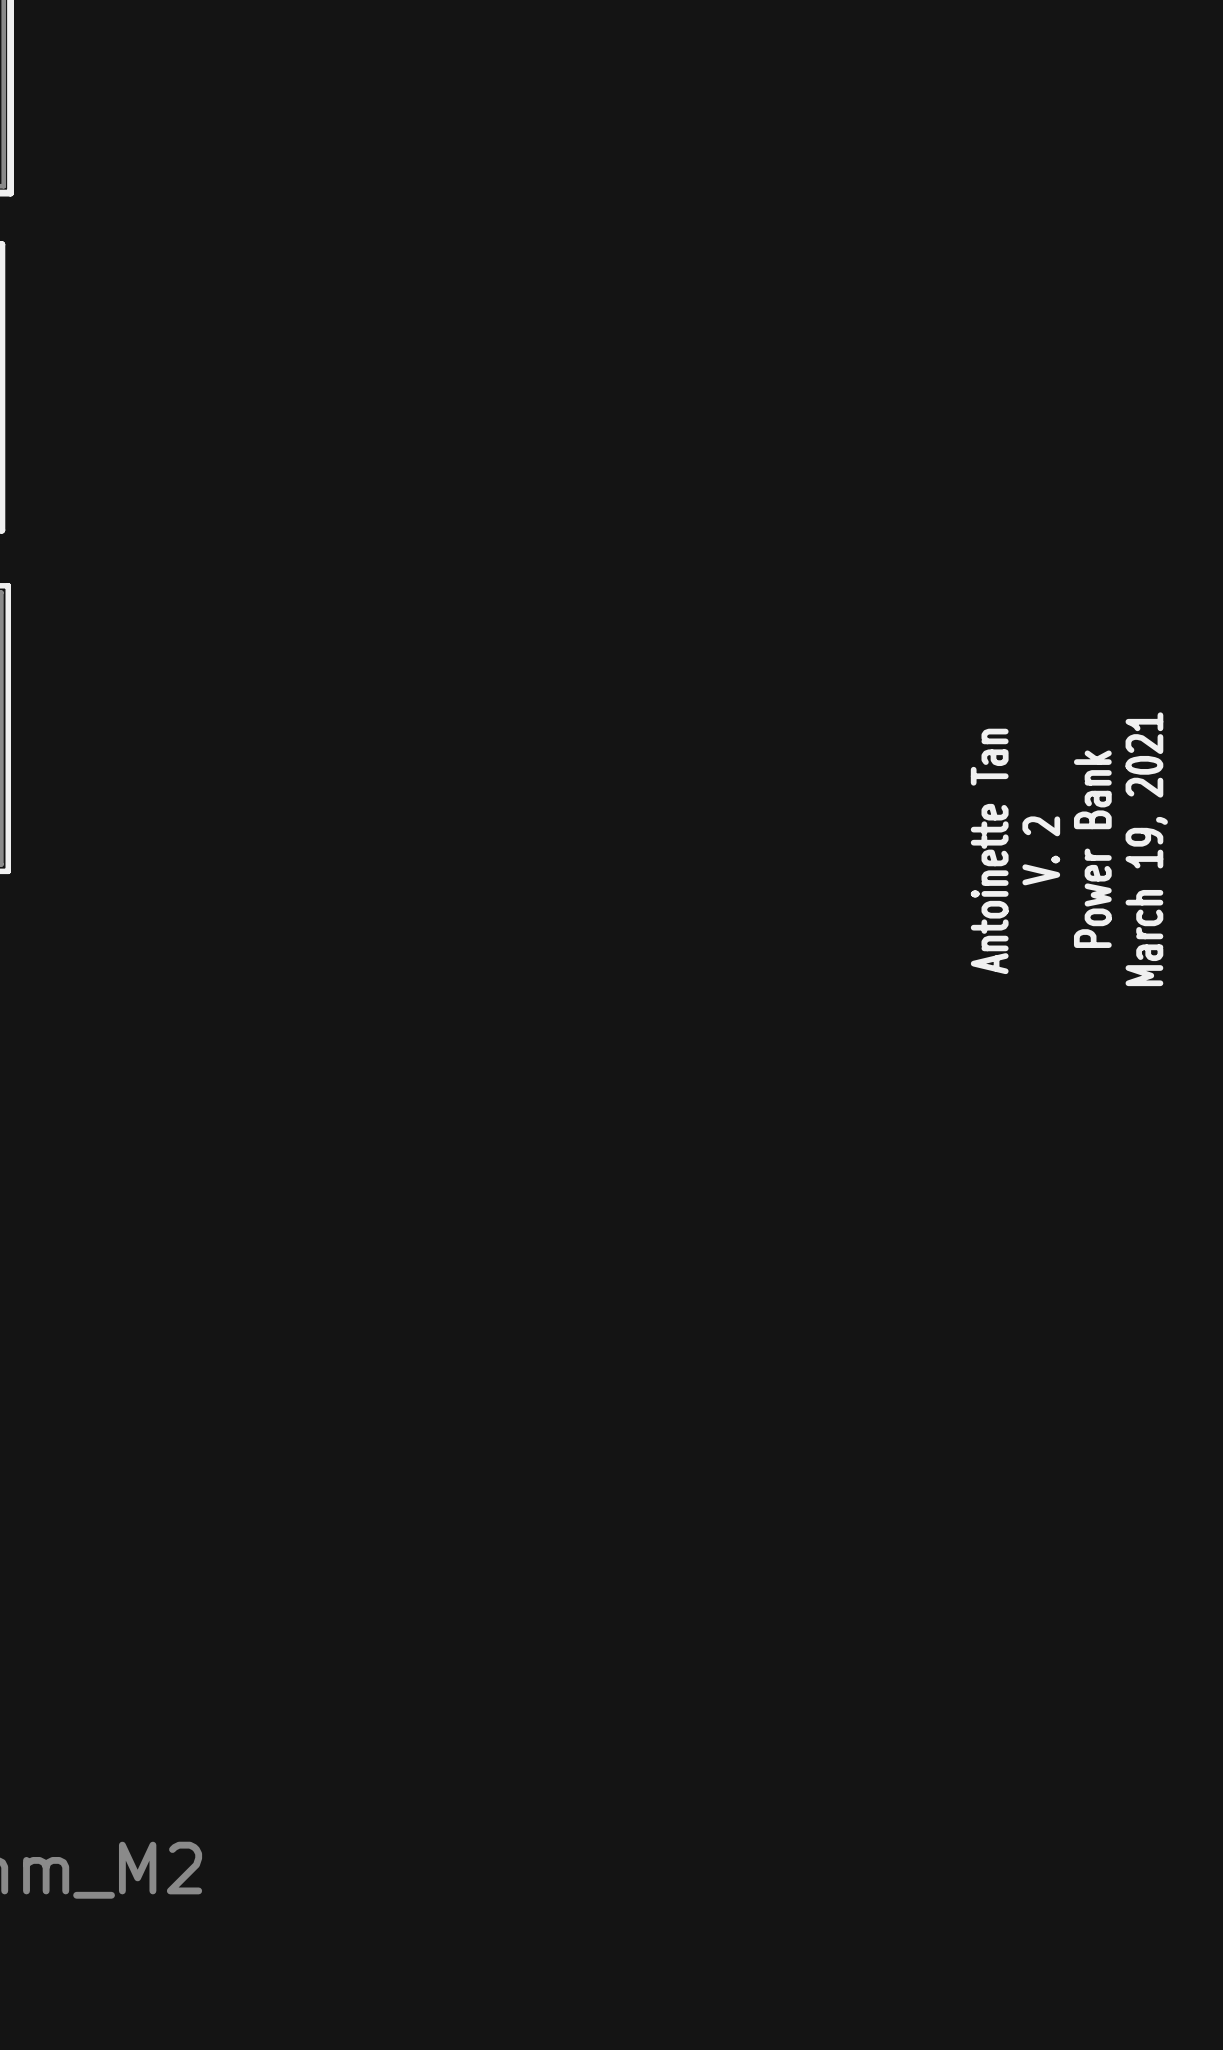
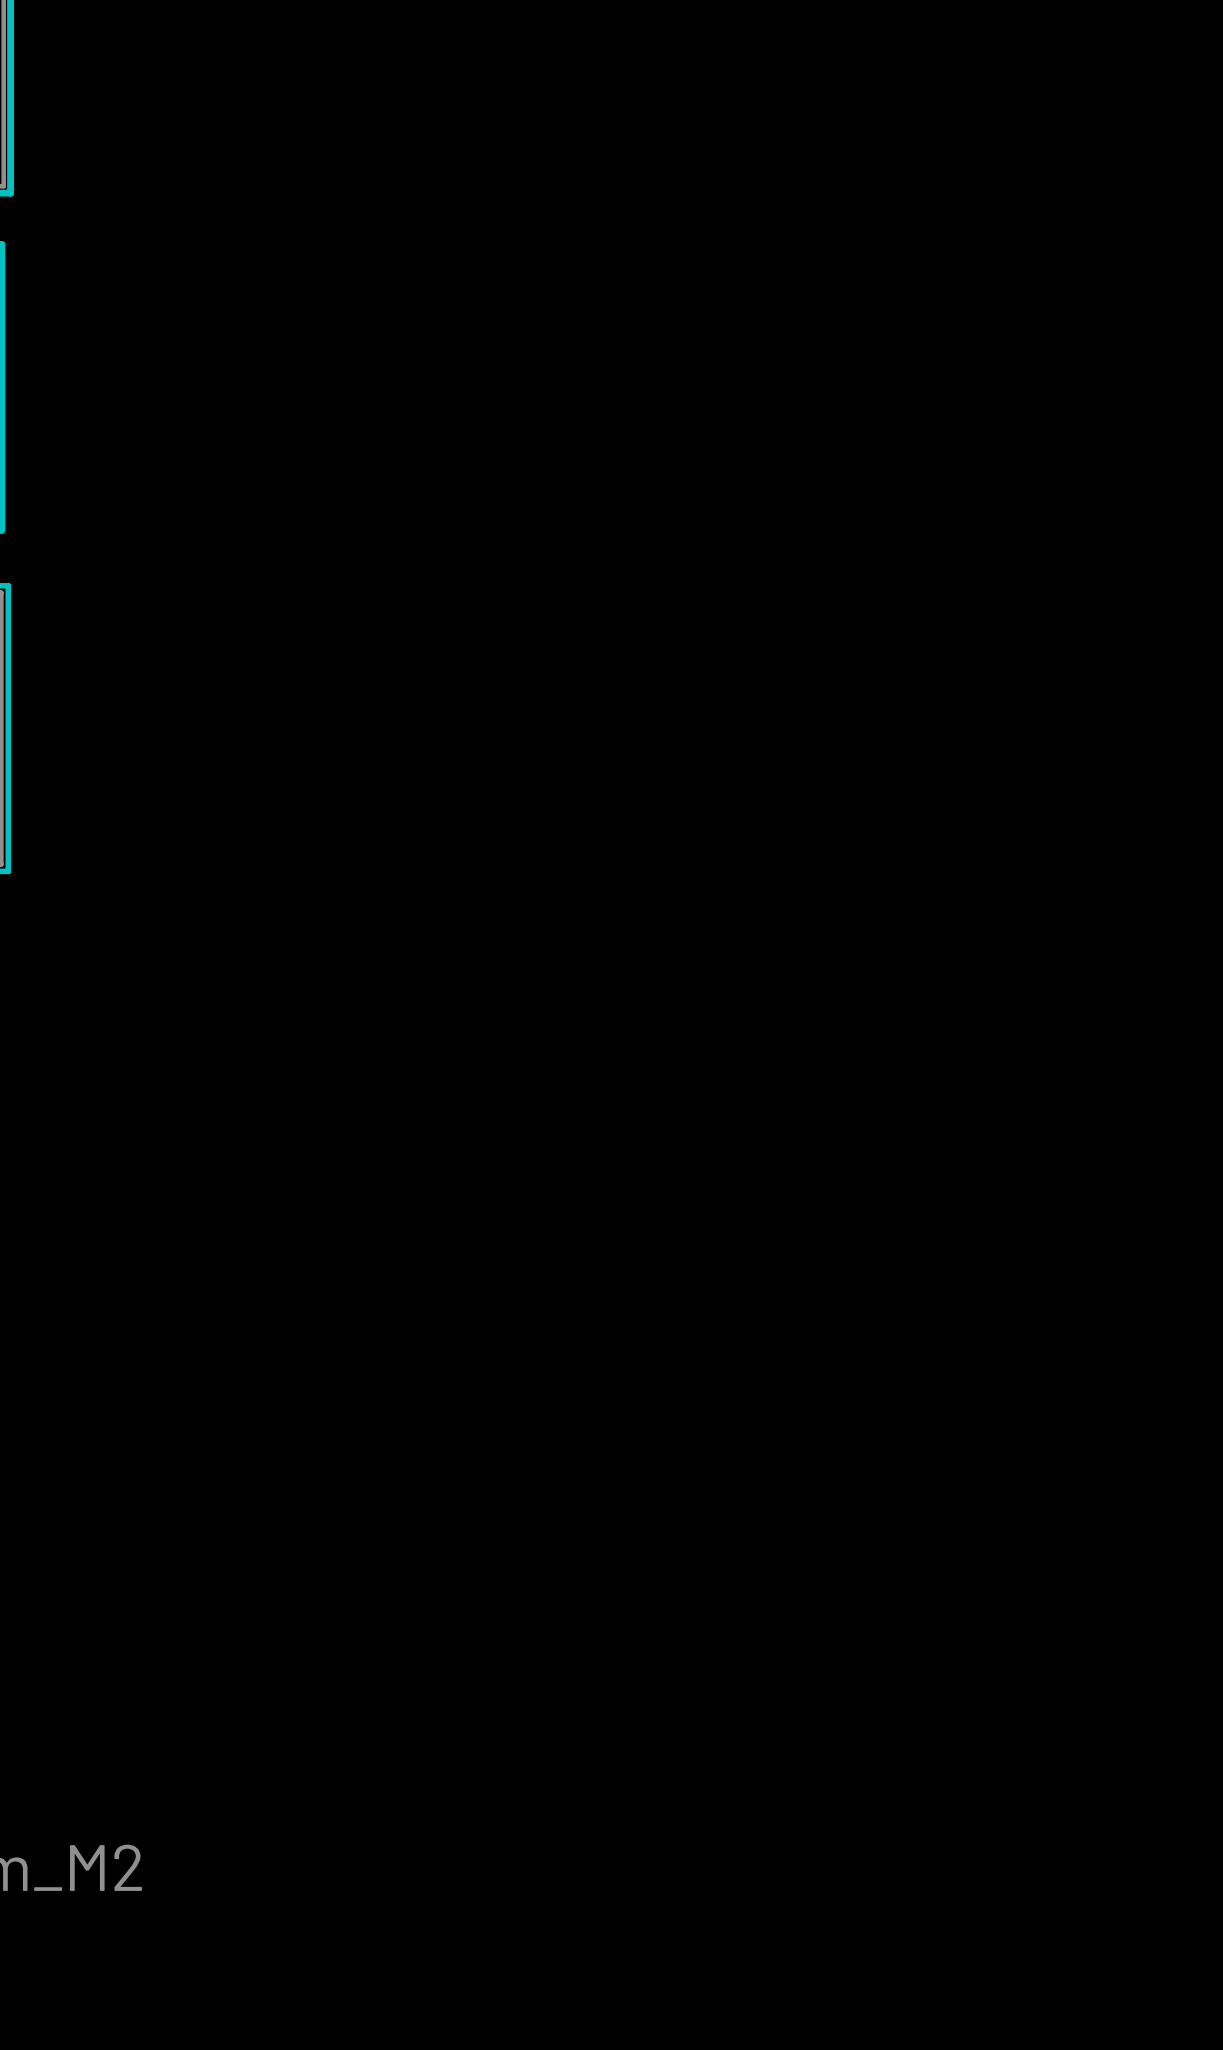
text: Power Bank (1092, 849) -> none
text: March 19, 2021 (1146, 849) -> none
text: V. 2 (1041, 850) -> none
text: Antoinette Tan (989, 851) -> none

